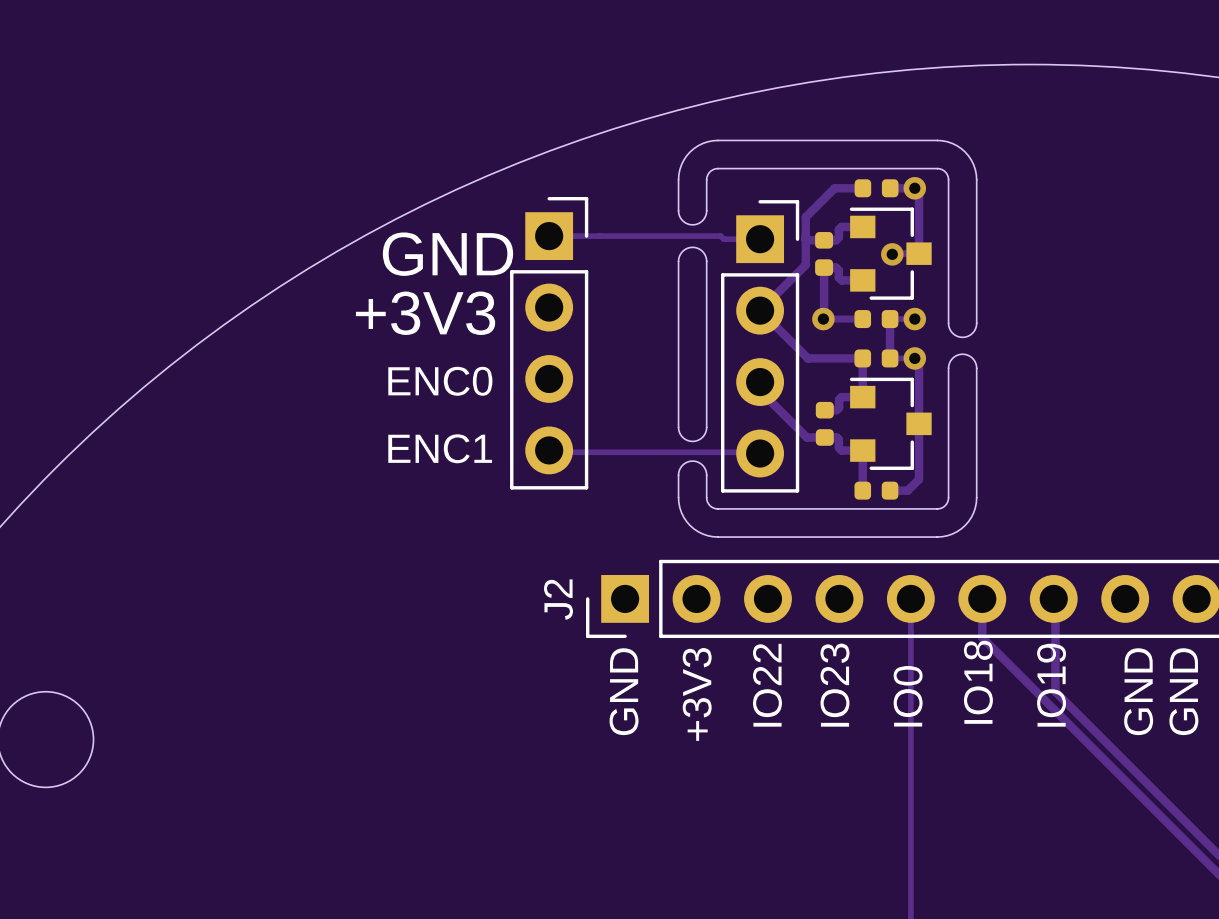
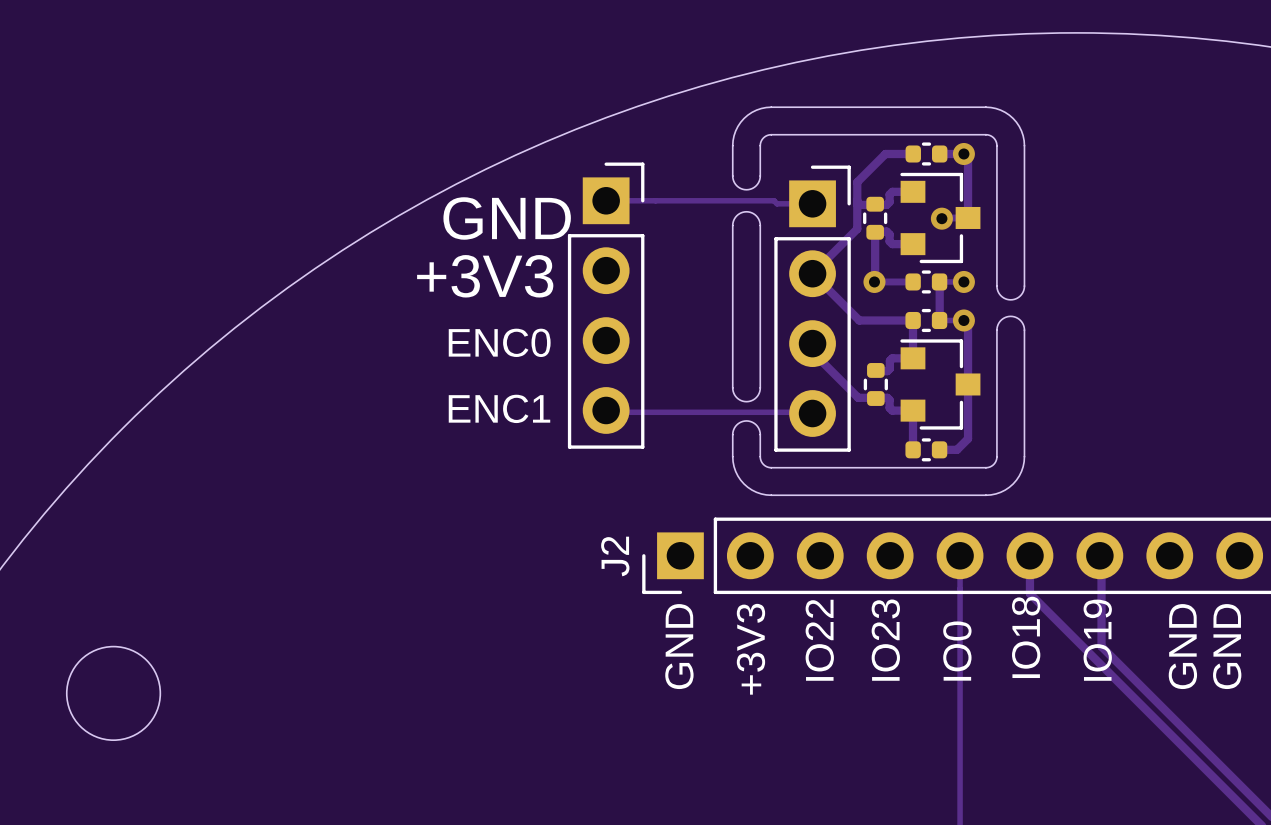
part footprint: [854, 179, 899, 198] -> [905, 142, 948, 166]
part footprint: [815, 232, 834, 276] -> [863, 196, 888, 240]
part footprint: [854, 310, 899, 329] -> [905, 270, 948, 294]
part footprint: [854, 349, 899, 368] -> [905, 308, 948, 333]
part footprint: [815, 401, 834, 446] -> [863, 363, 888, 406]
part footprint: [854, 481, 899, 500] -> [905, 438, 948, 462]

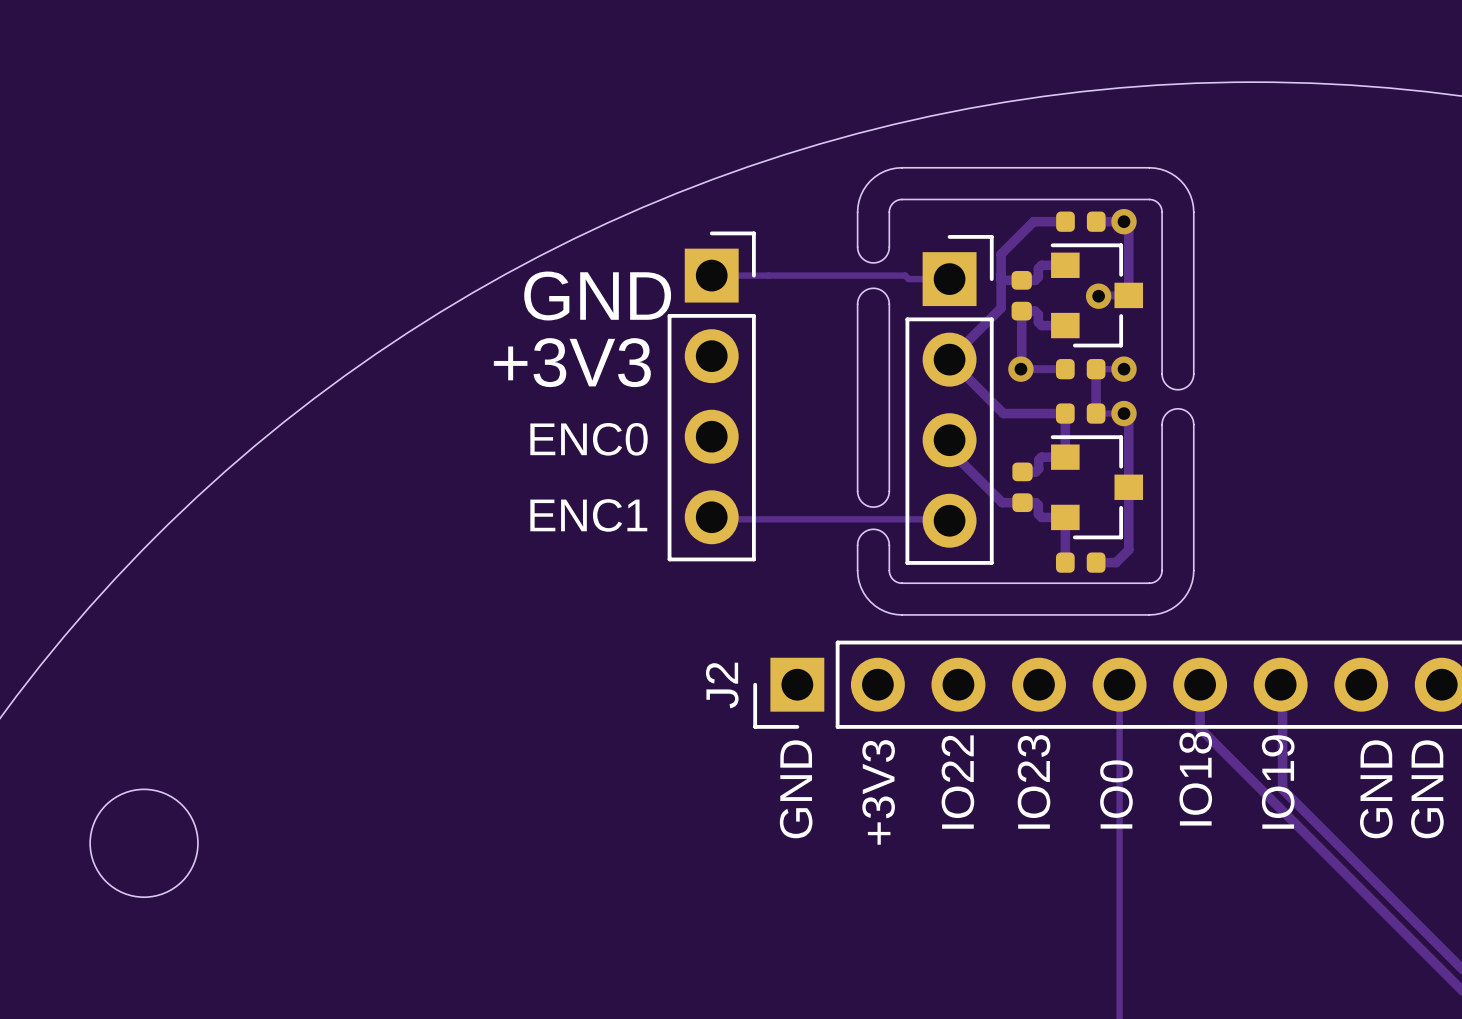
part footprint: [905, 142, 948, 166] -> [1056, 211, 1106, 232]
part footprint: [863, 196, 888, 240] -> [1011, 271, 1032, 321]
part footprint: [905, 270, 948, 294] -> [1055, 359, 1106, 380]
part footprint: [905, 308, 948, 333] -> [1055, 403, 1106, 424]
part footprint: [863, 363, 888, 406] -> [1012, 462, 1033, 513]
part footprint: [905, 438, 948, 462] -> [1055, 552, 1106, 573]

